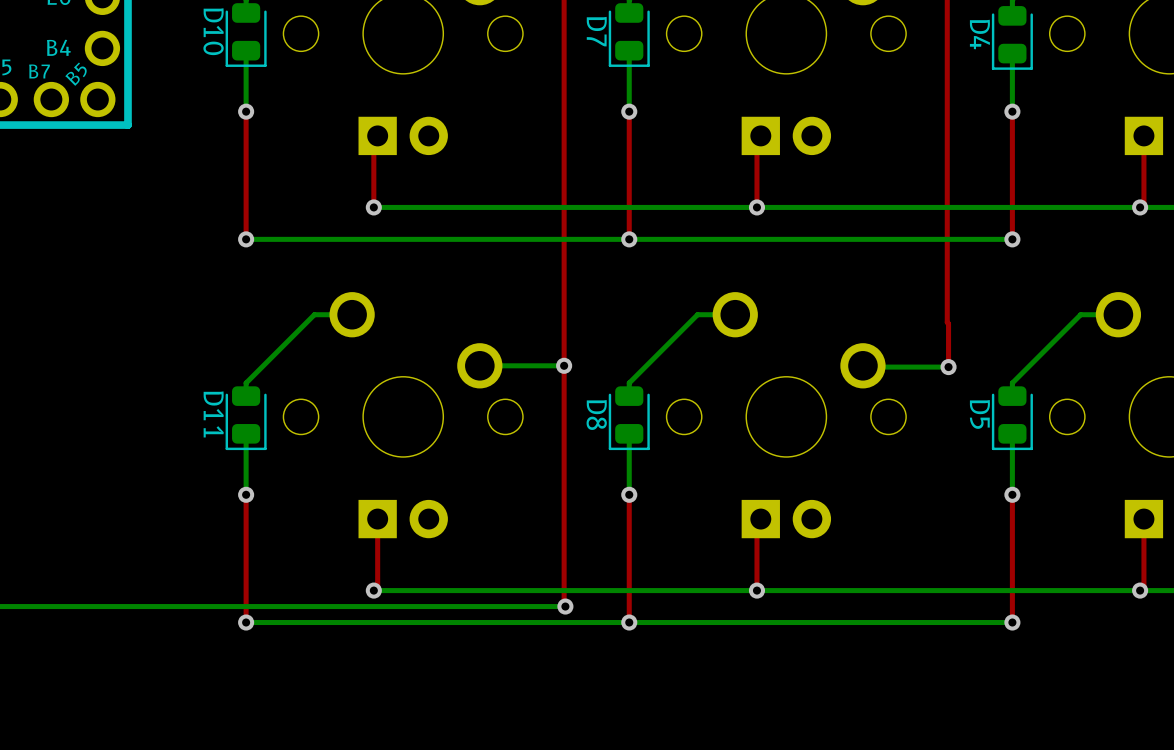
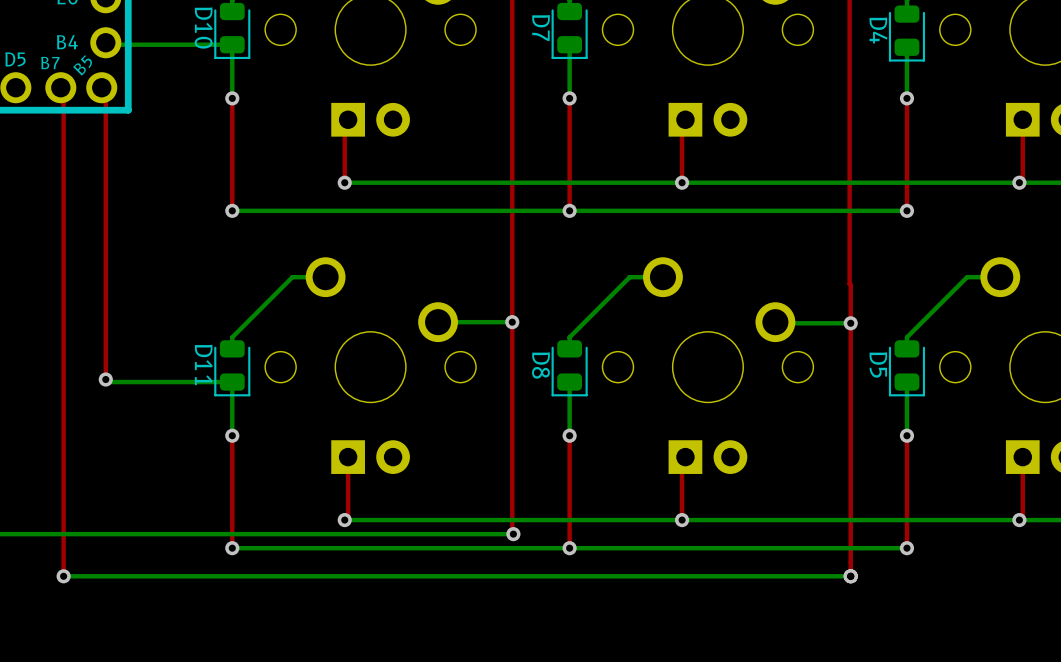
bottom track: none -> (105, 42) (107, 44) (232, 44)
top track: none -> (60, 87) (63, 90) (63, 576)
top track: none -> (101, 87) (105, 91) (105, 379)
top track: none -> (850, 323) (850, 576)
bottom track: none -> (105, 379) (108, 382) (232, 382)
via: none -> (105, 379)
via: none -> (63, 576)
bottom track: none -> (850, 576) (63, 576)
via: none -> (850, 576)

